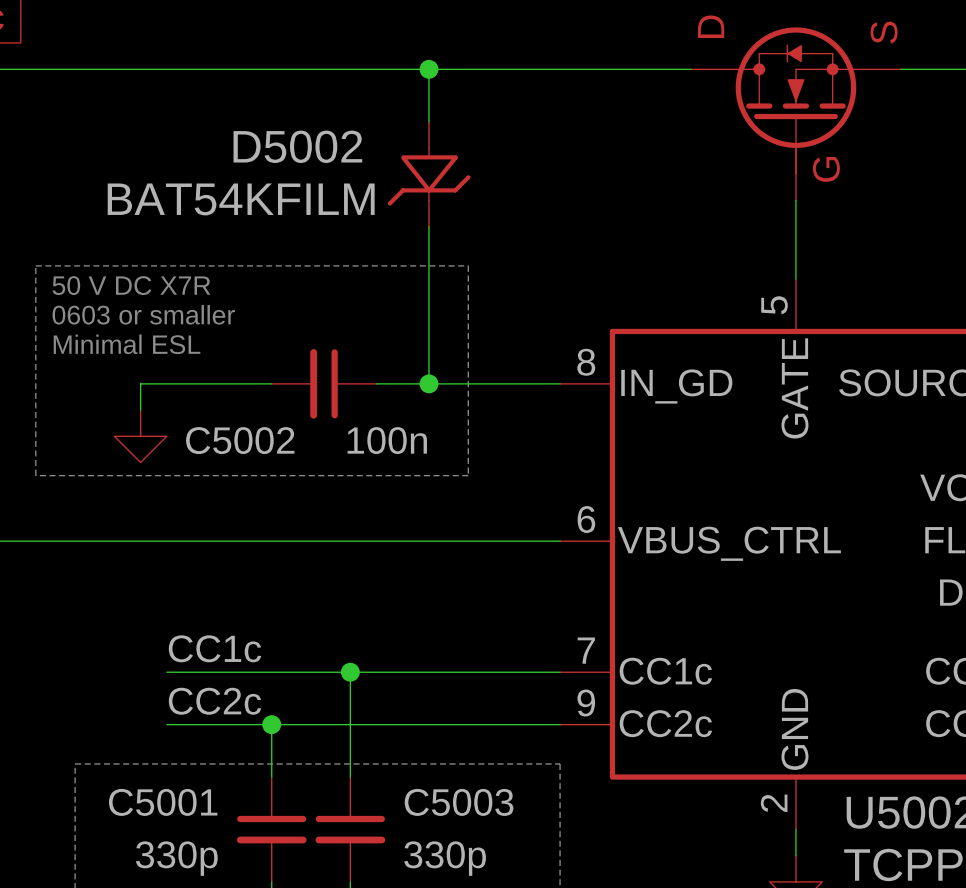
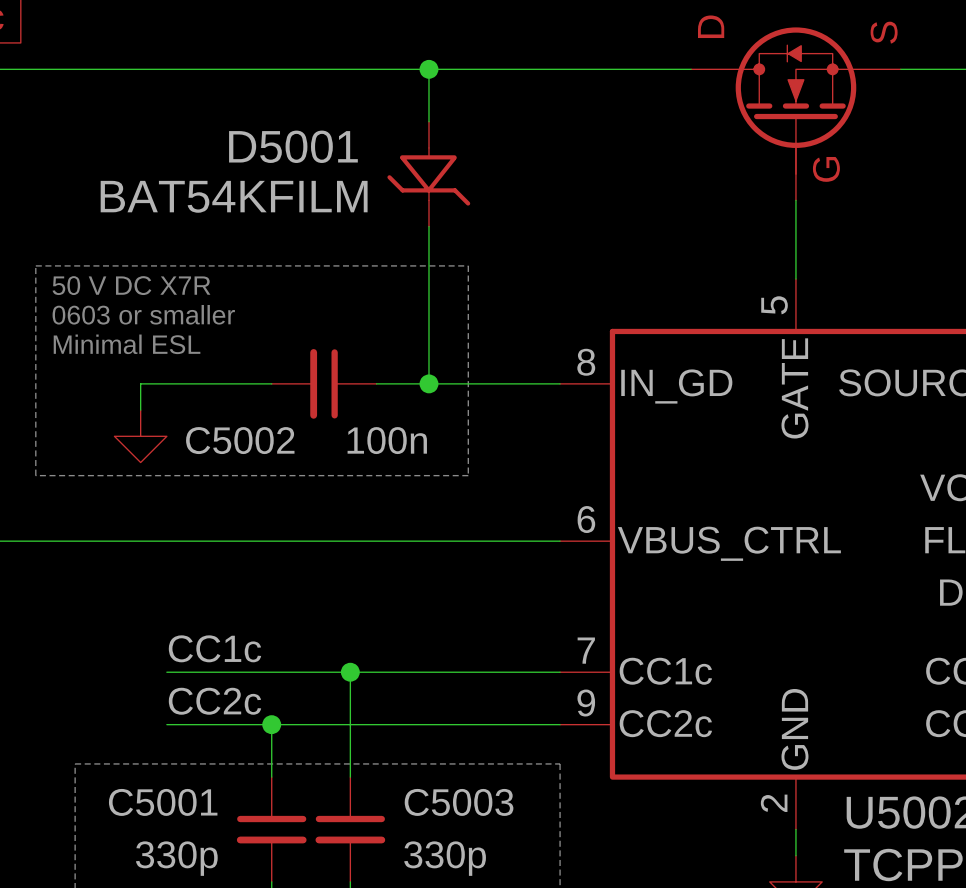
D5001: none -> BAT54KFILM (428, 174)
D5002: BAT54KFILM (429, 174) -> none

